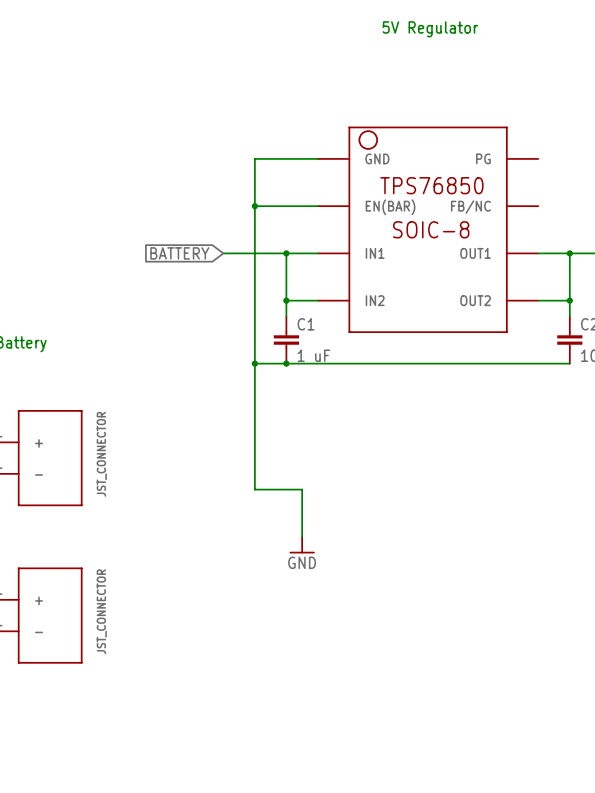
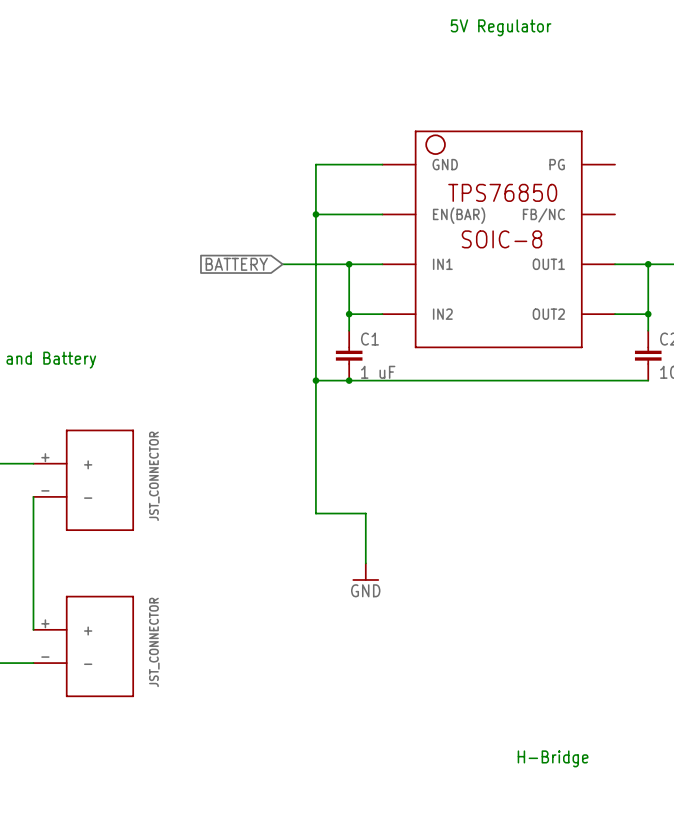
text: none -> H-Bridge (553, 758)

